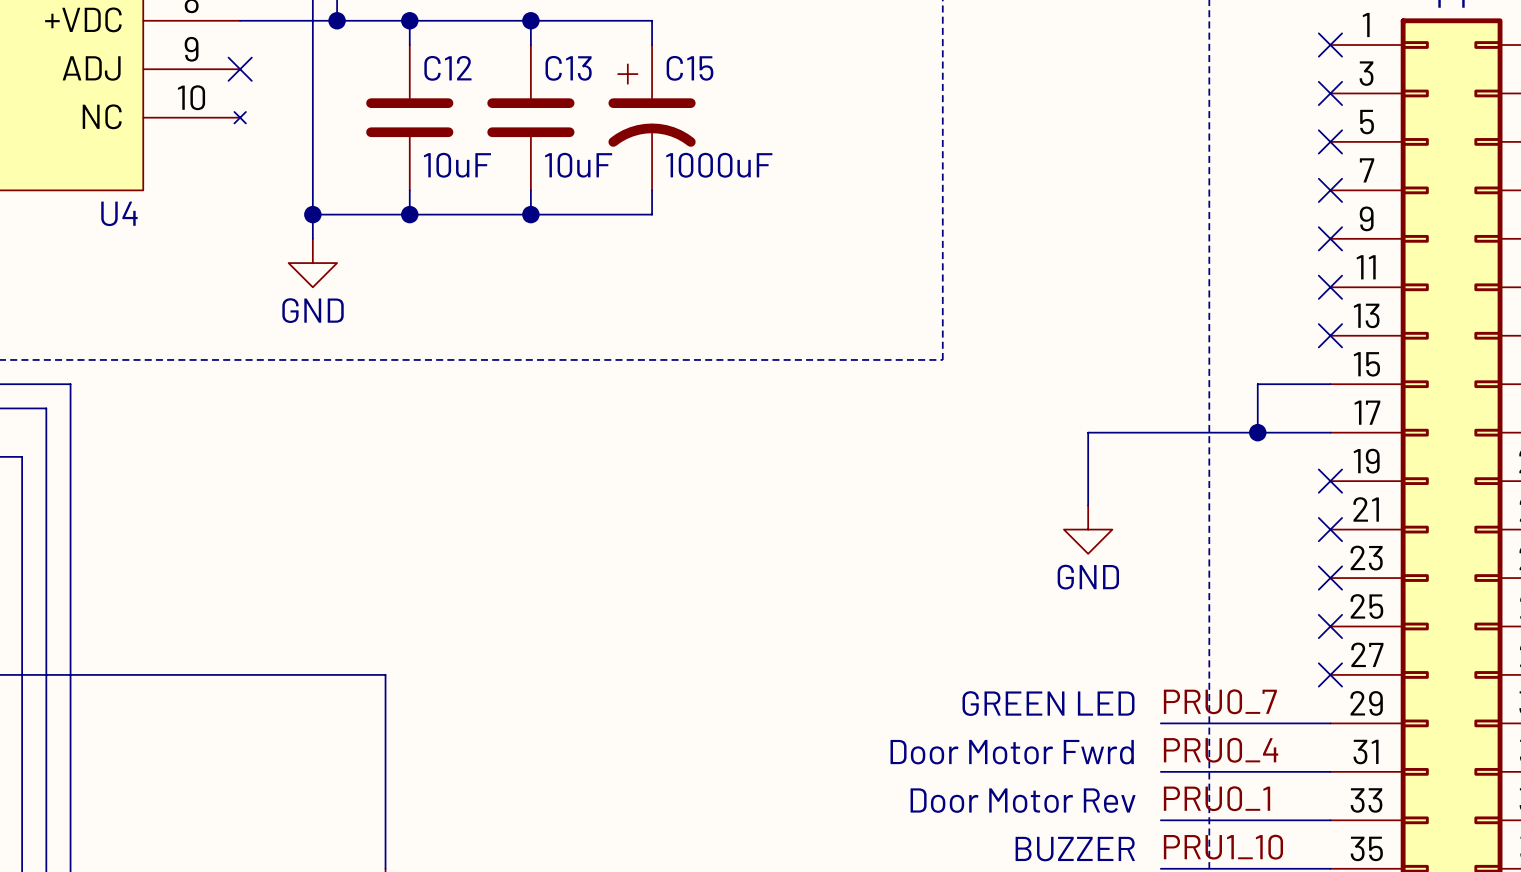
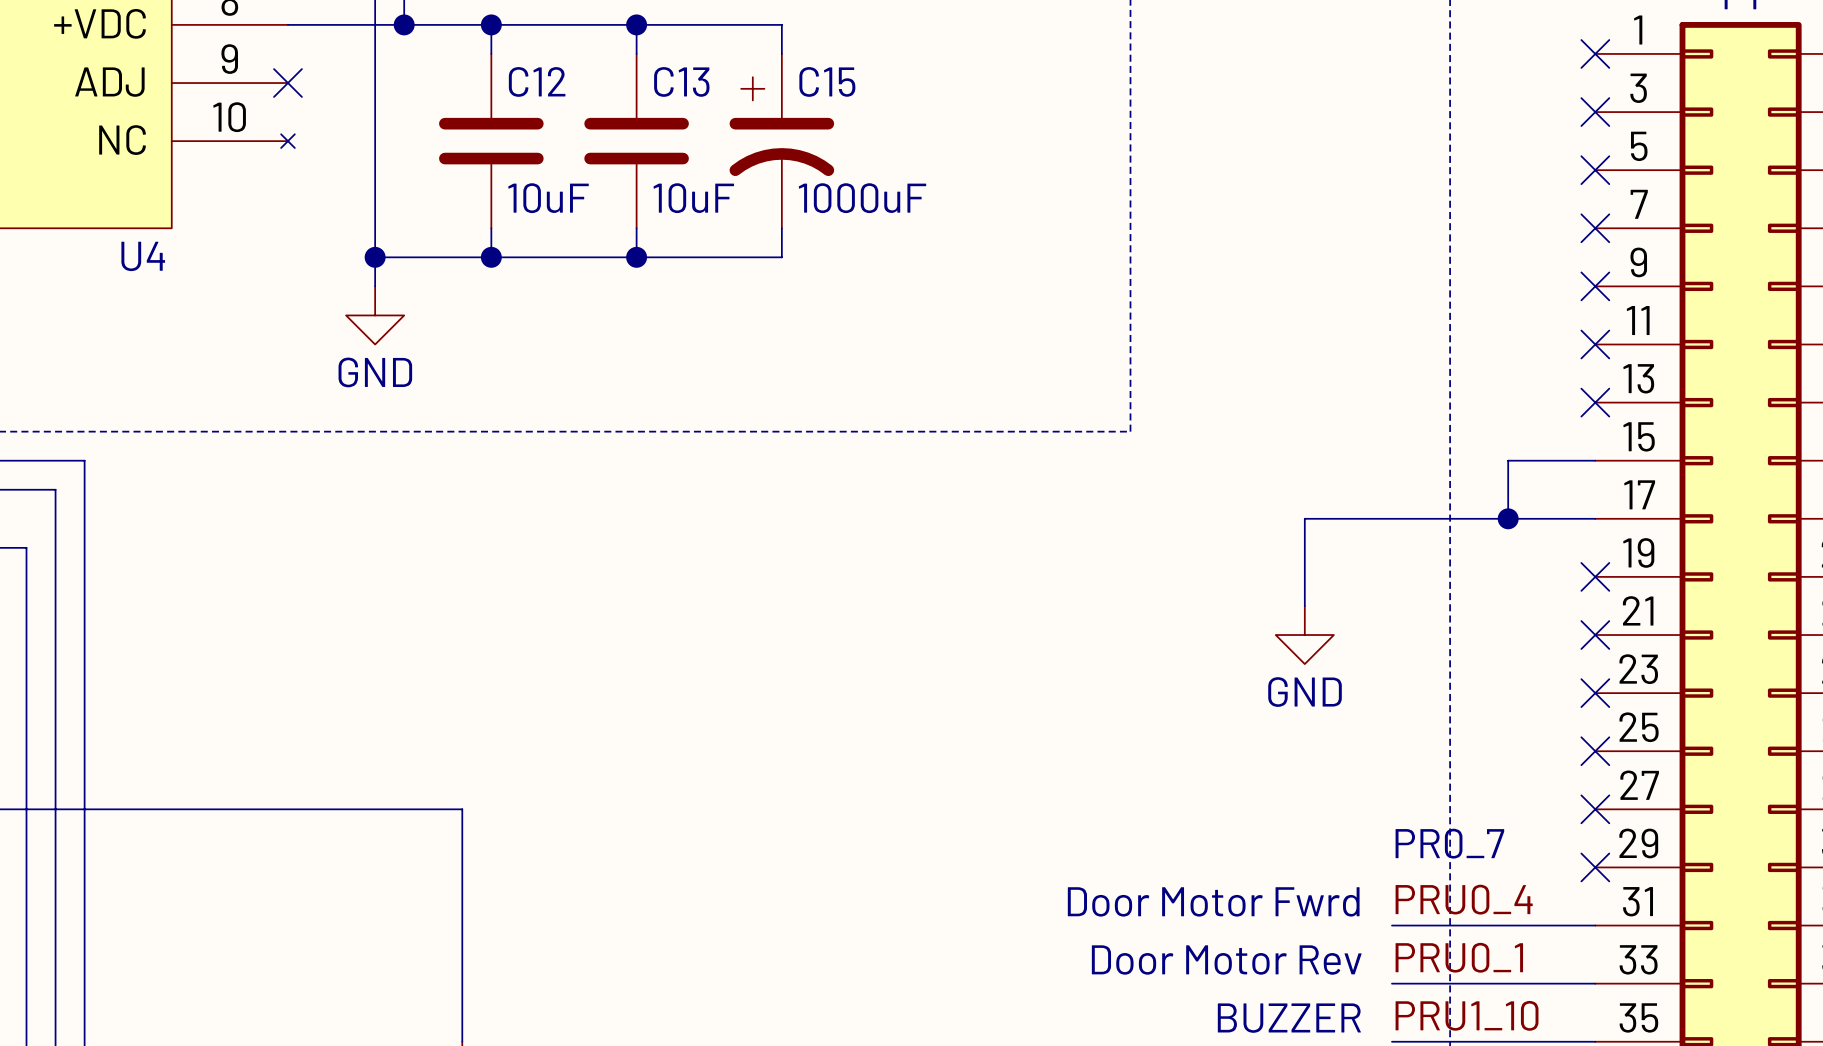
label: PRU0_7 (1220, 701) -> none
text: GREEN LED (1048, 703) -> none
text: none -> PR0_7 (1449, 843)
wire: (1160, 723) (1330, 723) -> none
no-connect mark: none -> (1595, 867)

